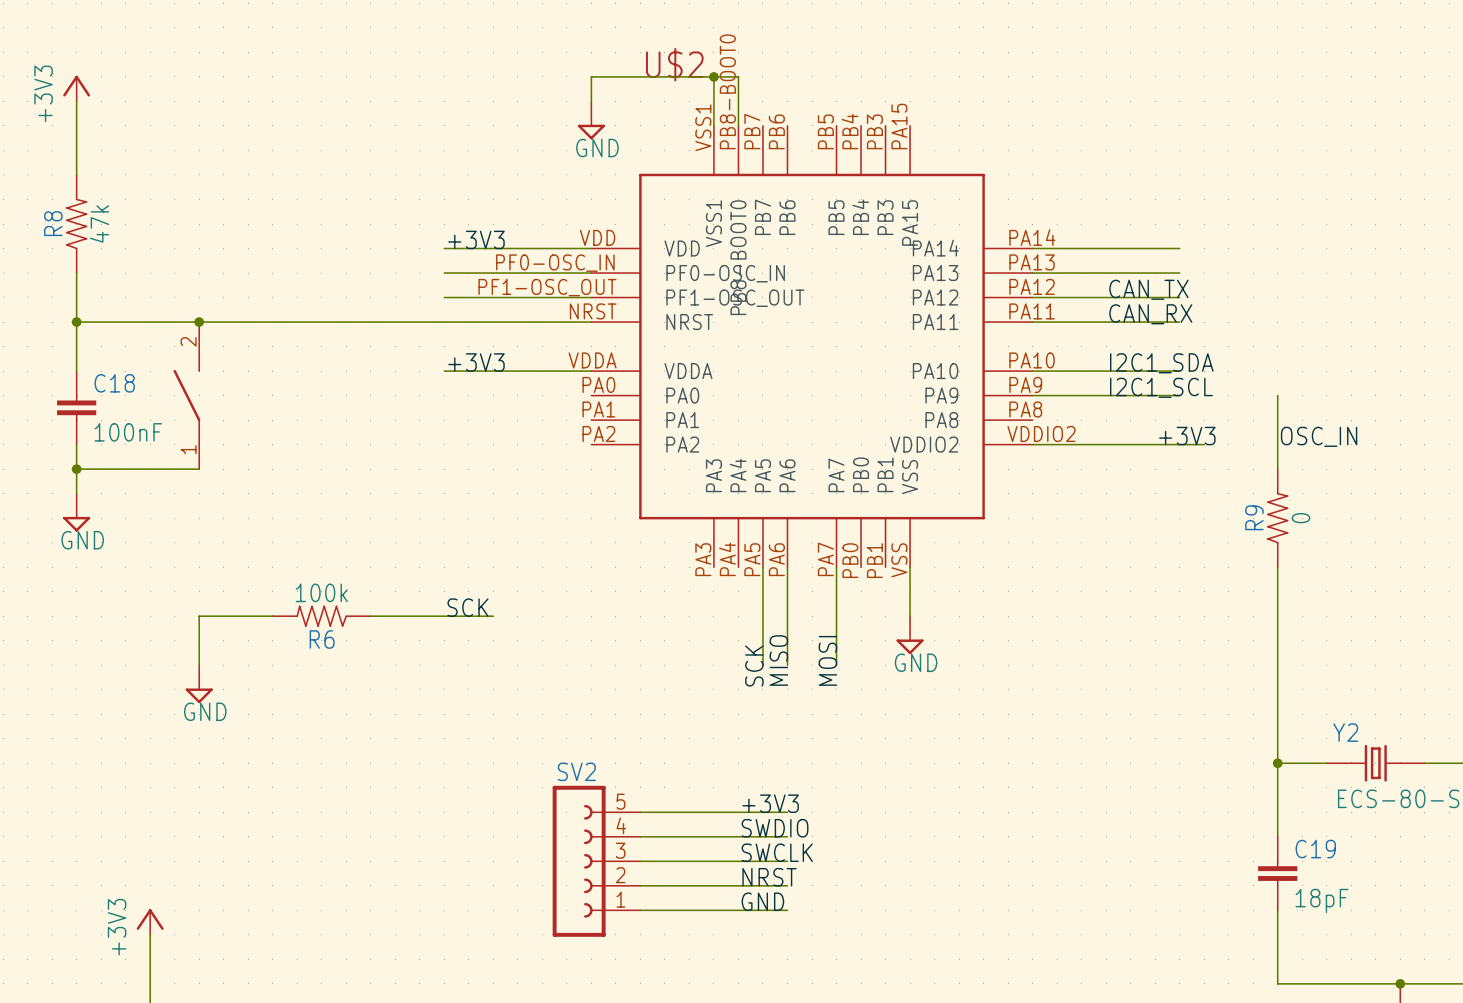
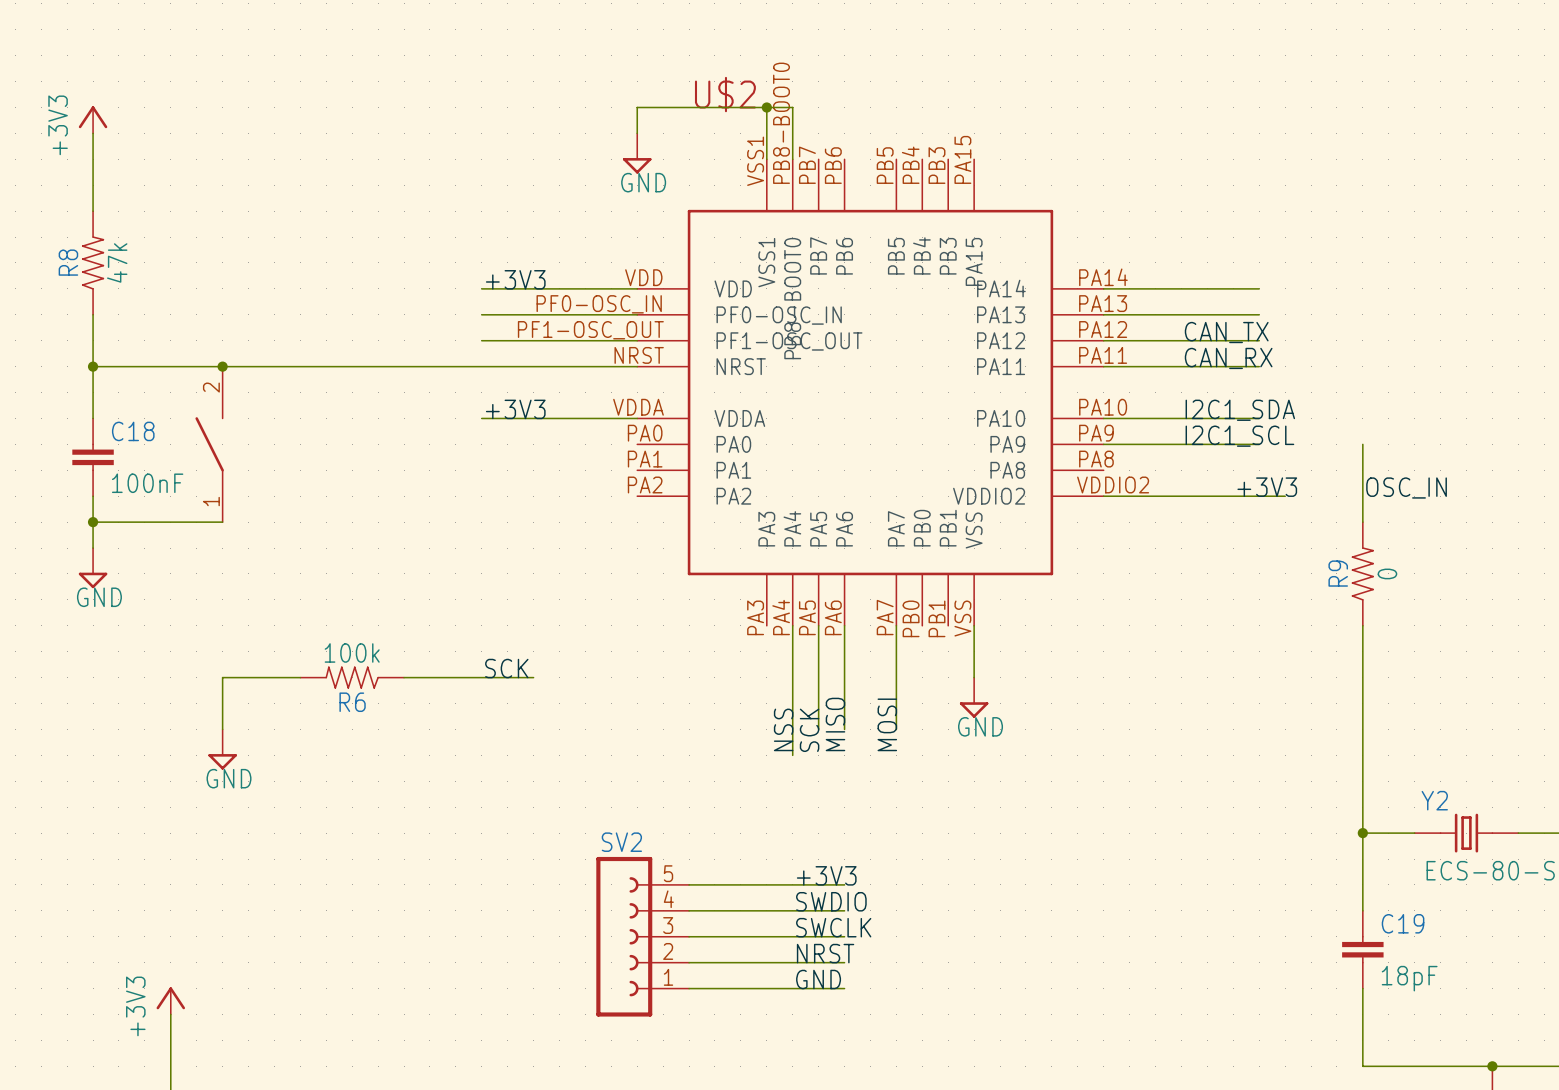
wire: none -> (792, 625) (792, 755)
label: none -> NSS (783, 729)

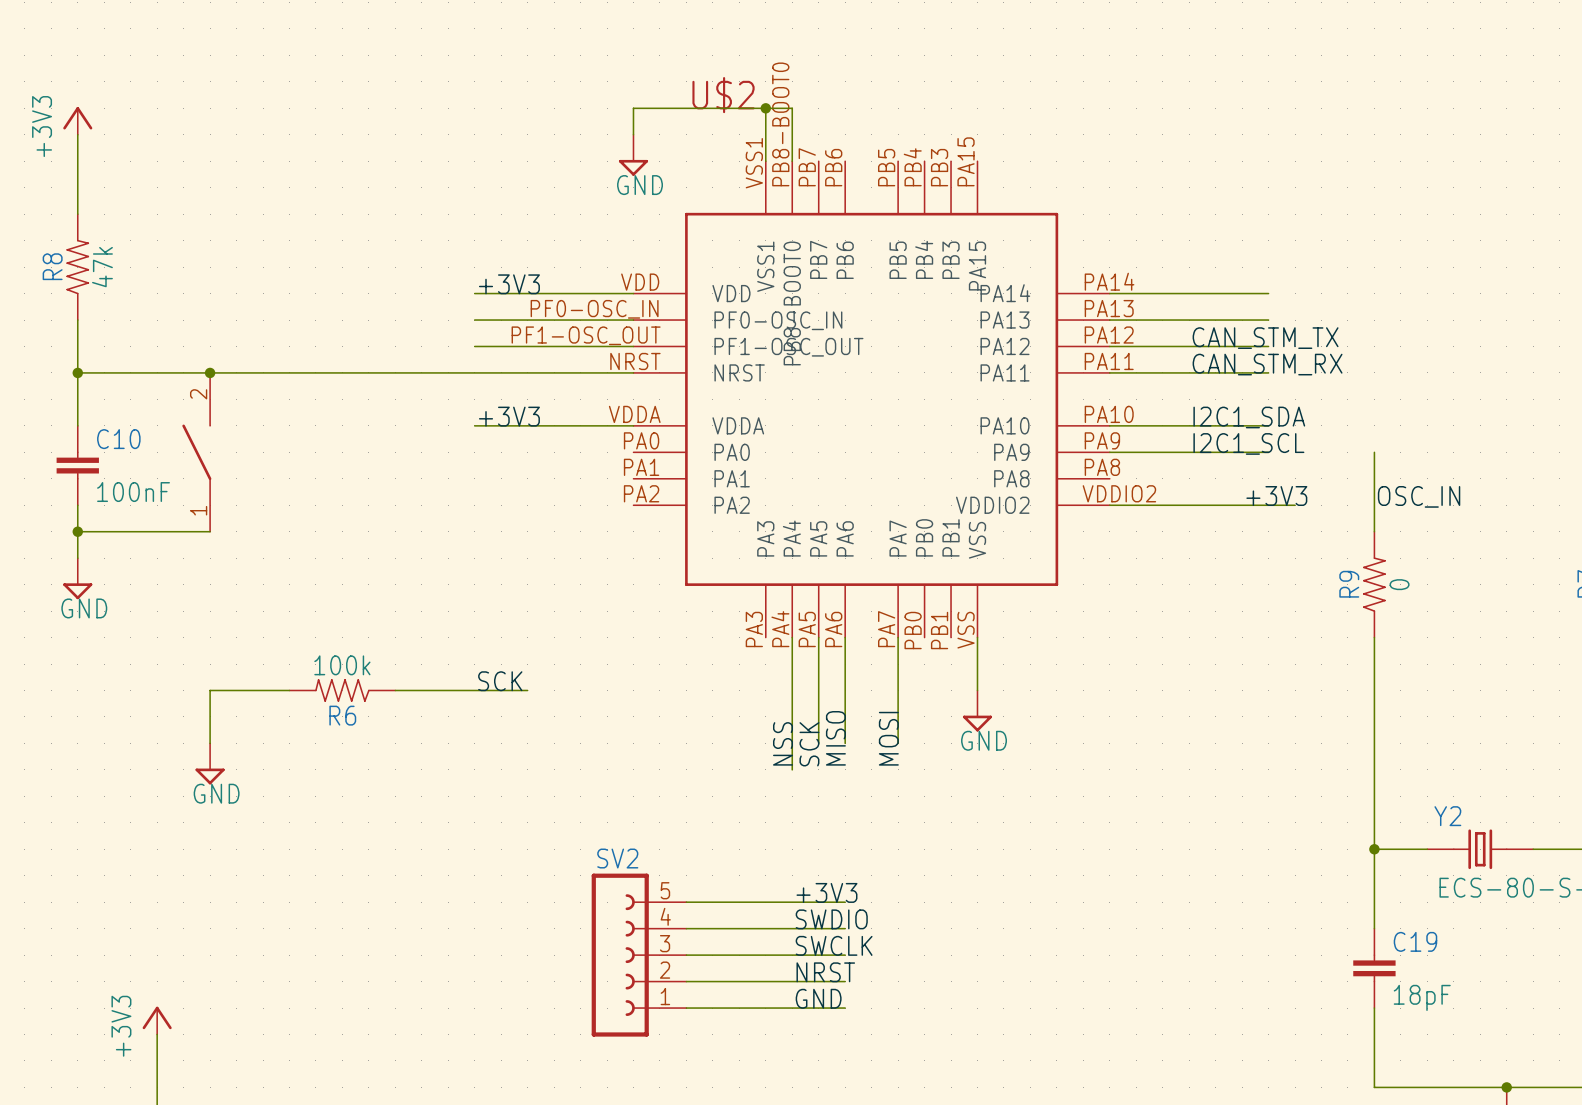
label: CAN_TX (1226, 332) -> CAN_STM_TX (1265, 338)
label: CAN_RX (1228, 358) -> CAN_STM_RX (1267, 364)
C18 name: C18 (133, 431) -> C10 (118, 439)

